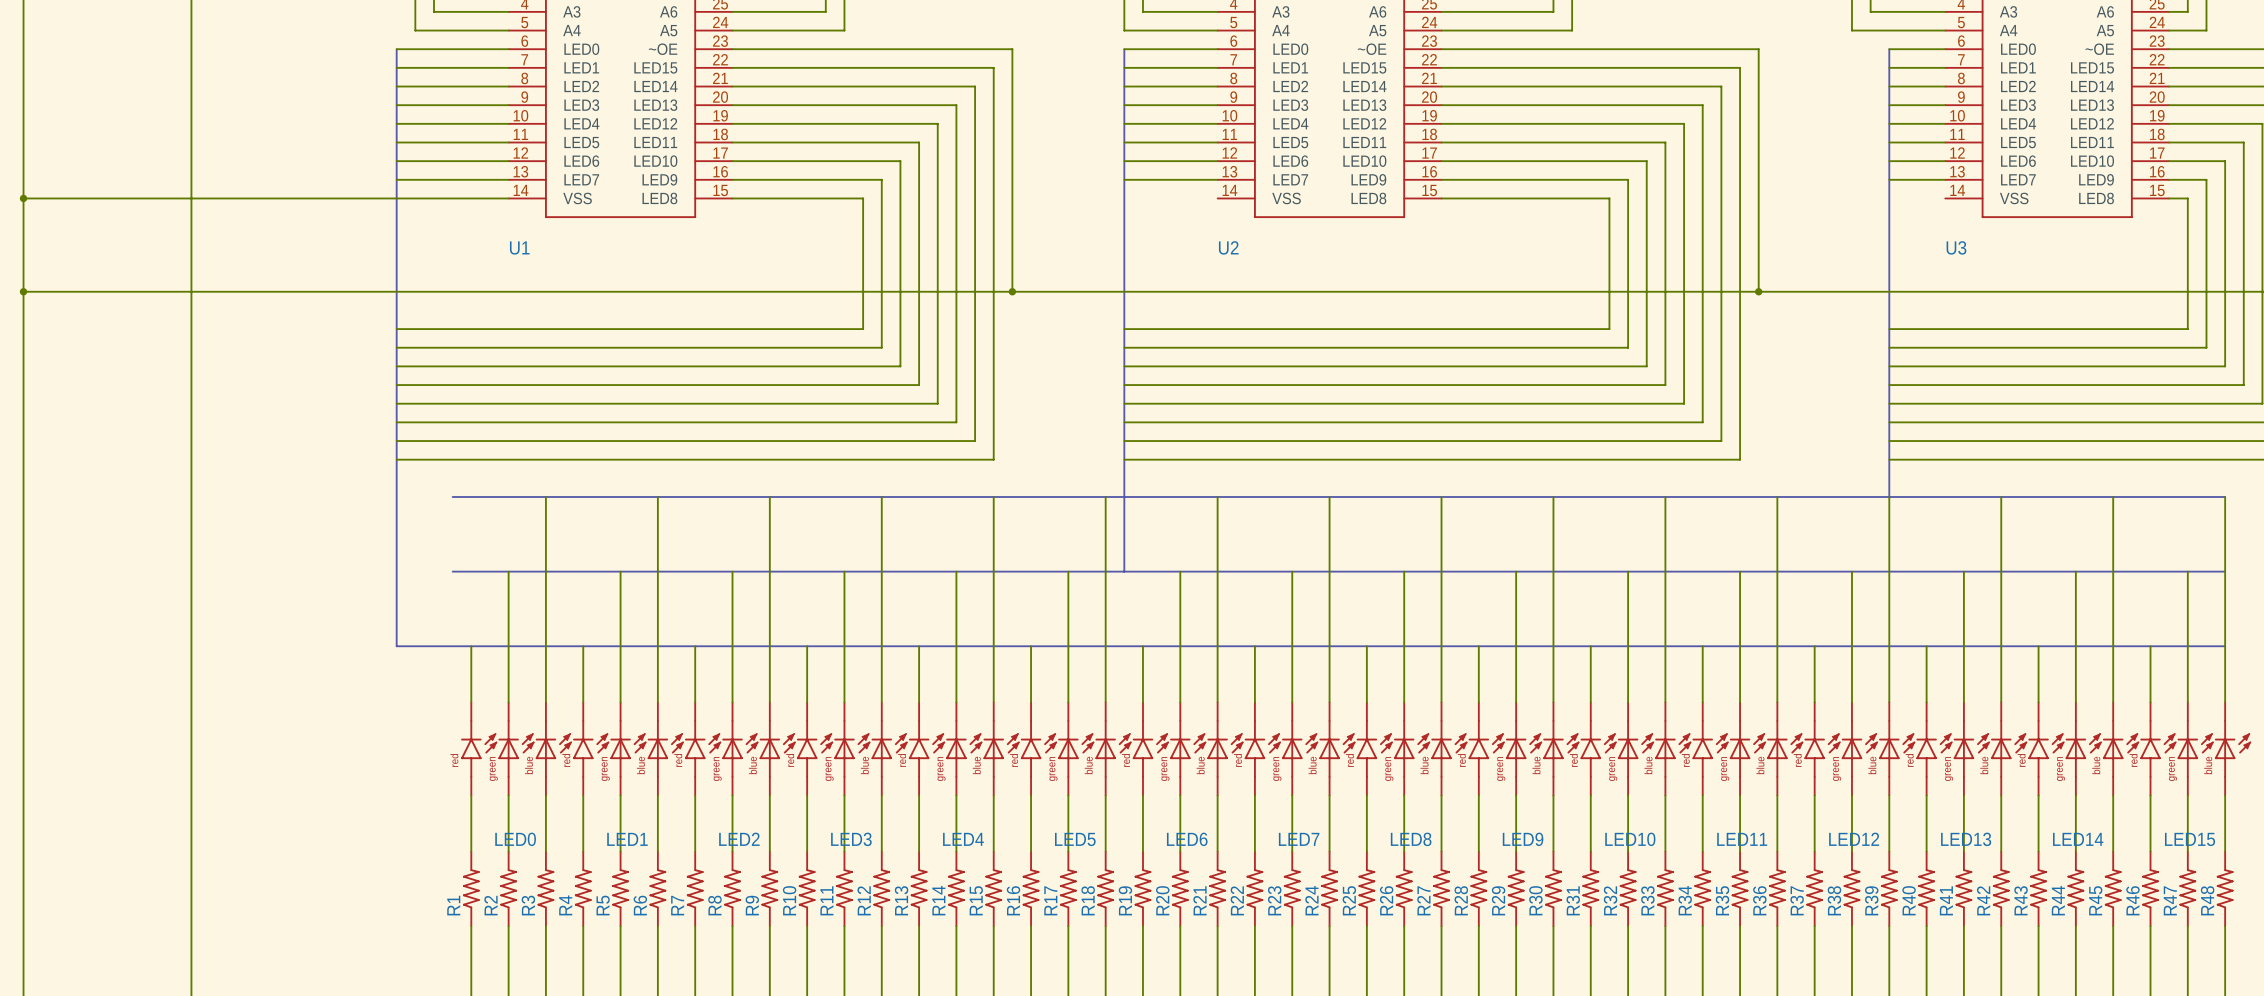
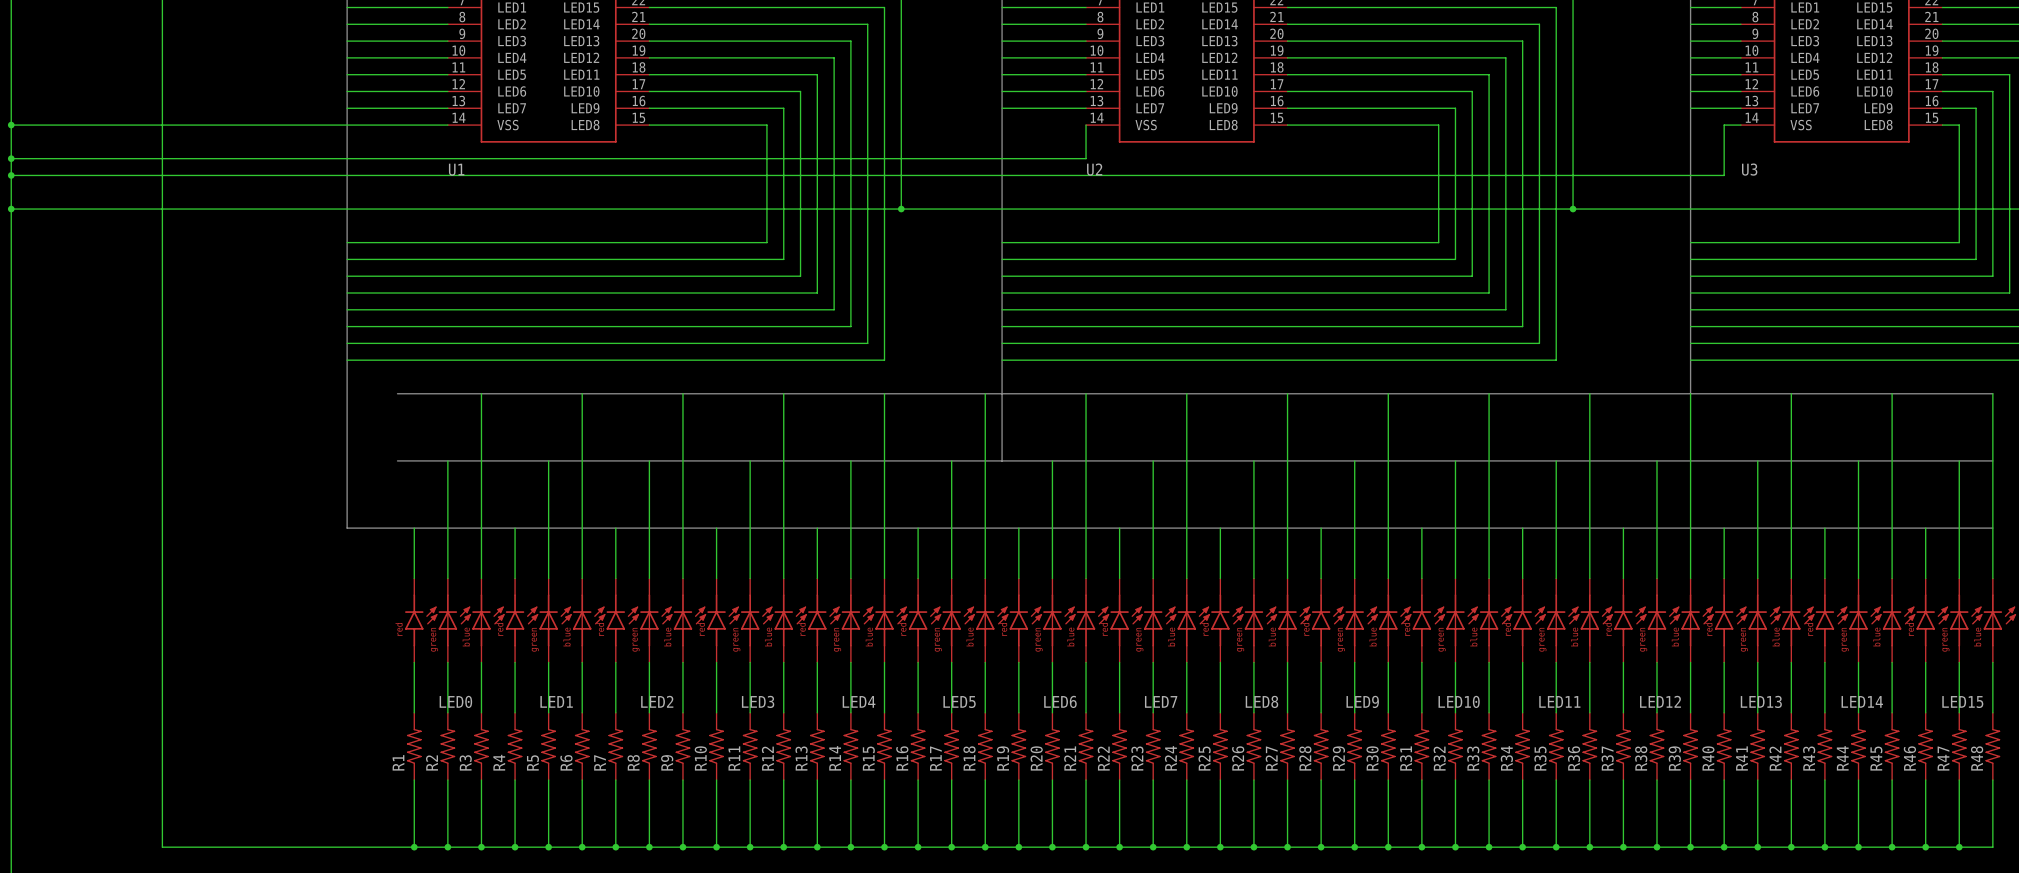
wire: none -> (1086, 125) (1086, 158) (11, 158)
wire: none -> (1740, 125) (1724, 125) (1724, 175) (11, 175)
junction: none -> (11, 158)
junction: none -> (11, 175)

